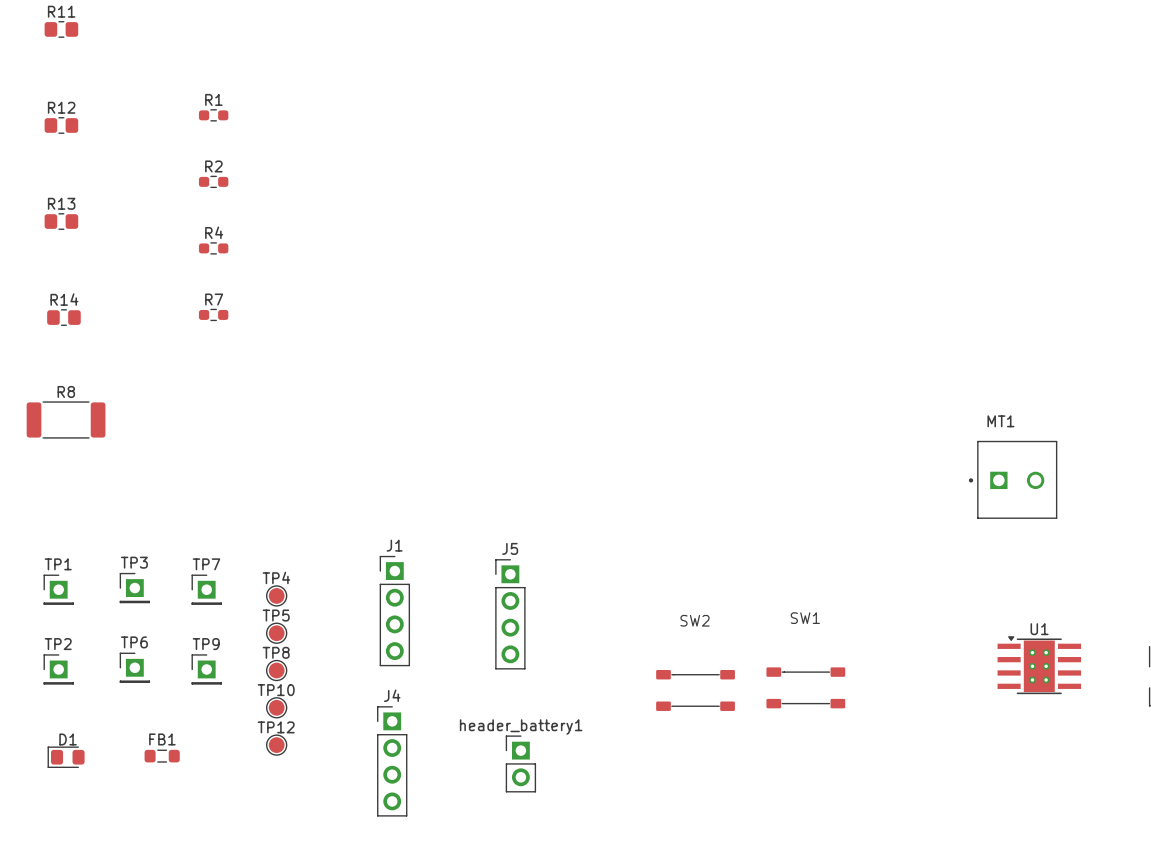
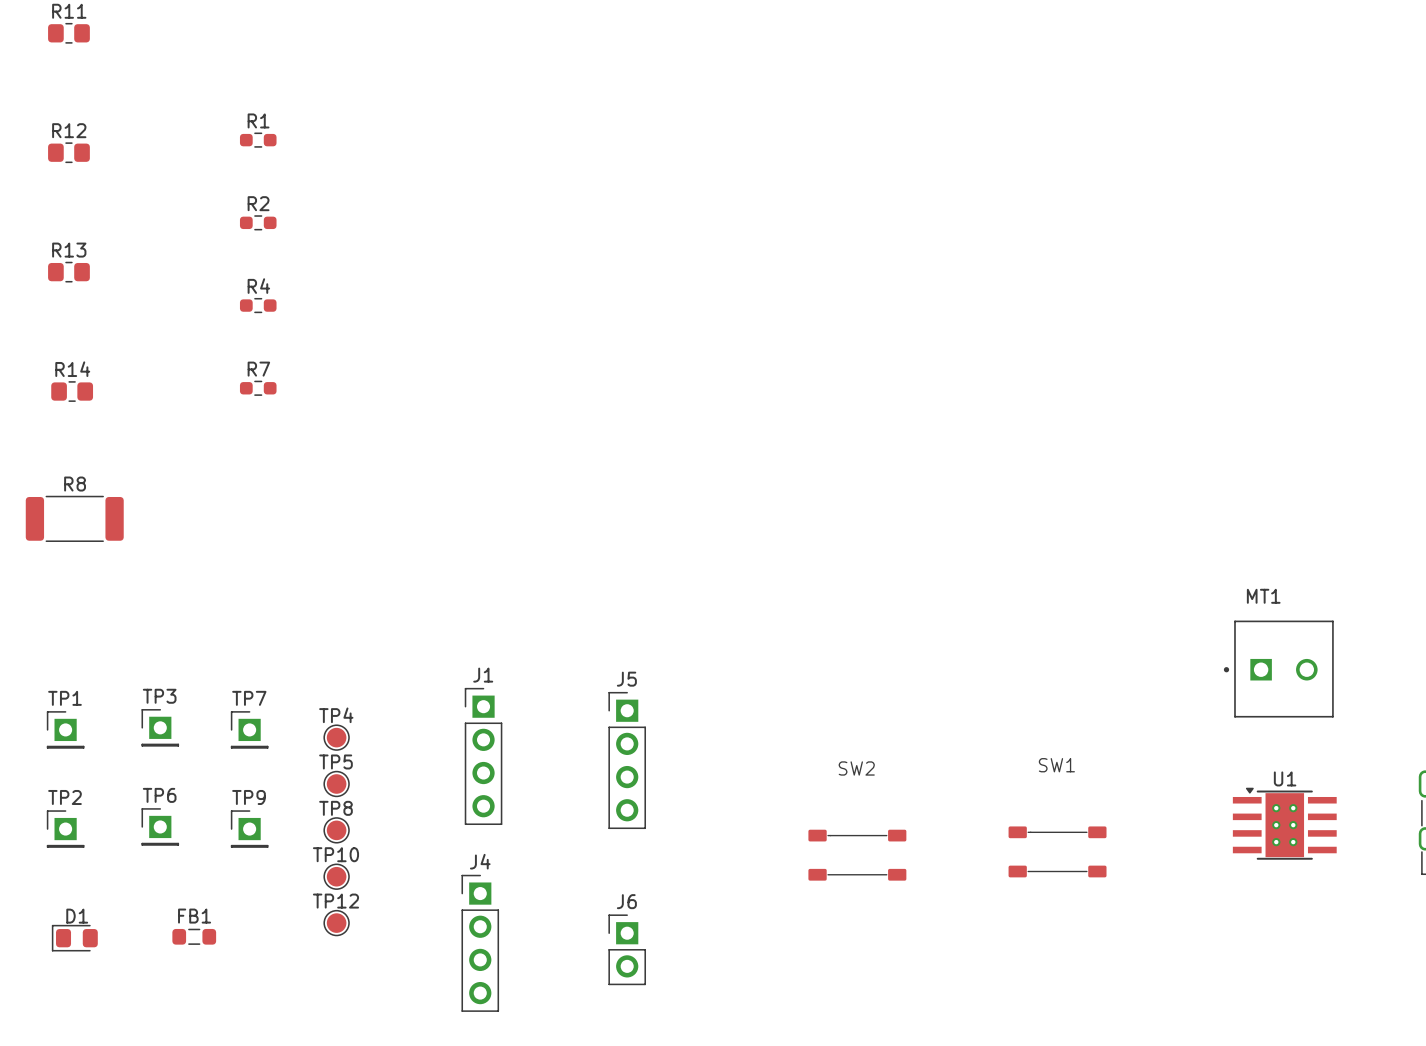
MT1 position: (1013, 479) -> (1278, 669)
SW1 position: (805, 687) -> (1057, 851)
header_battery1: (520, 763) -> none
J6: none -> (627, 949)

